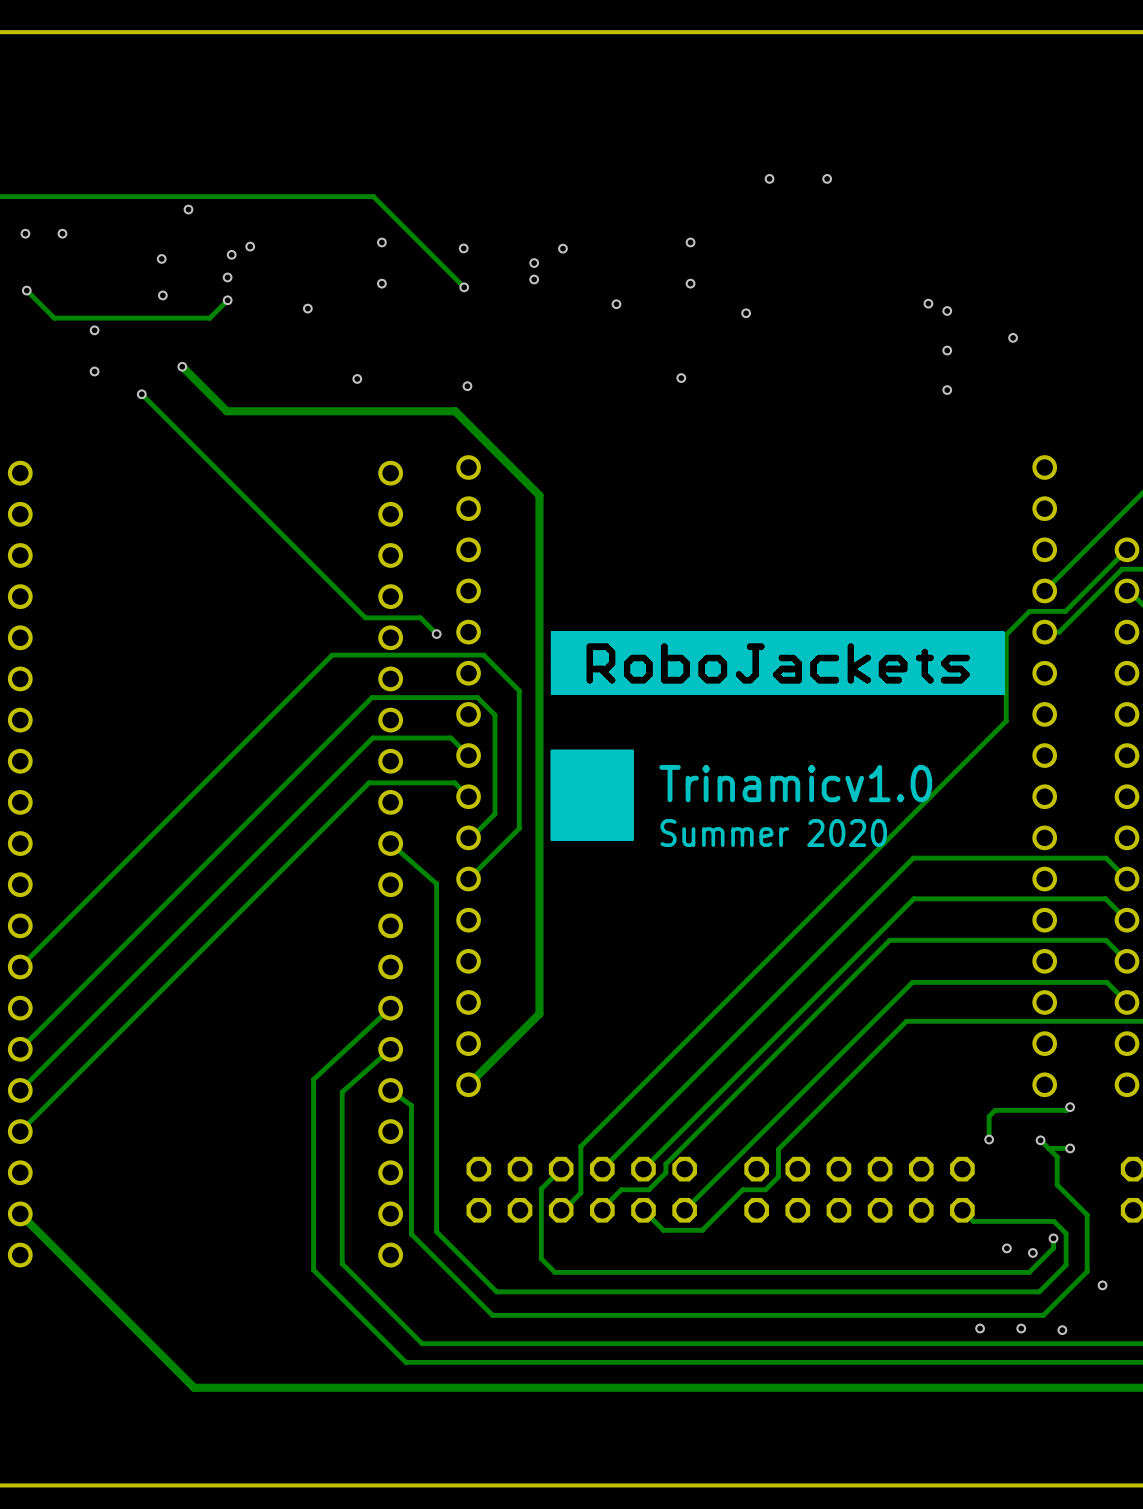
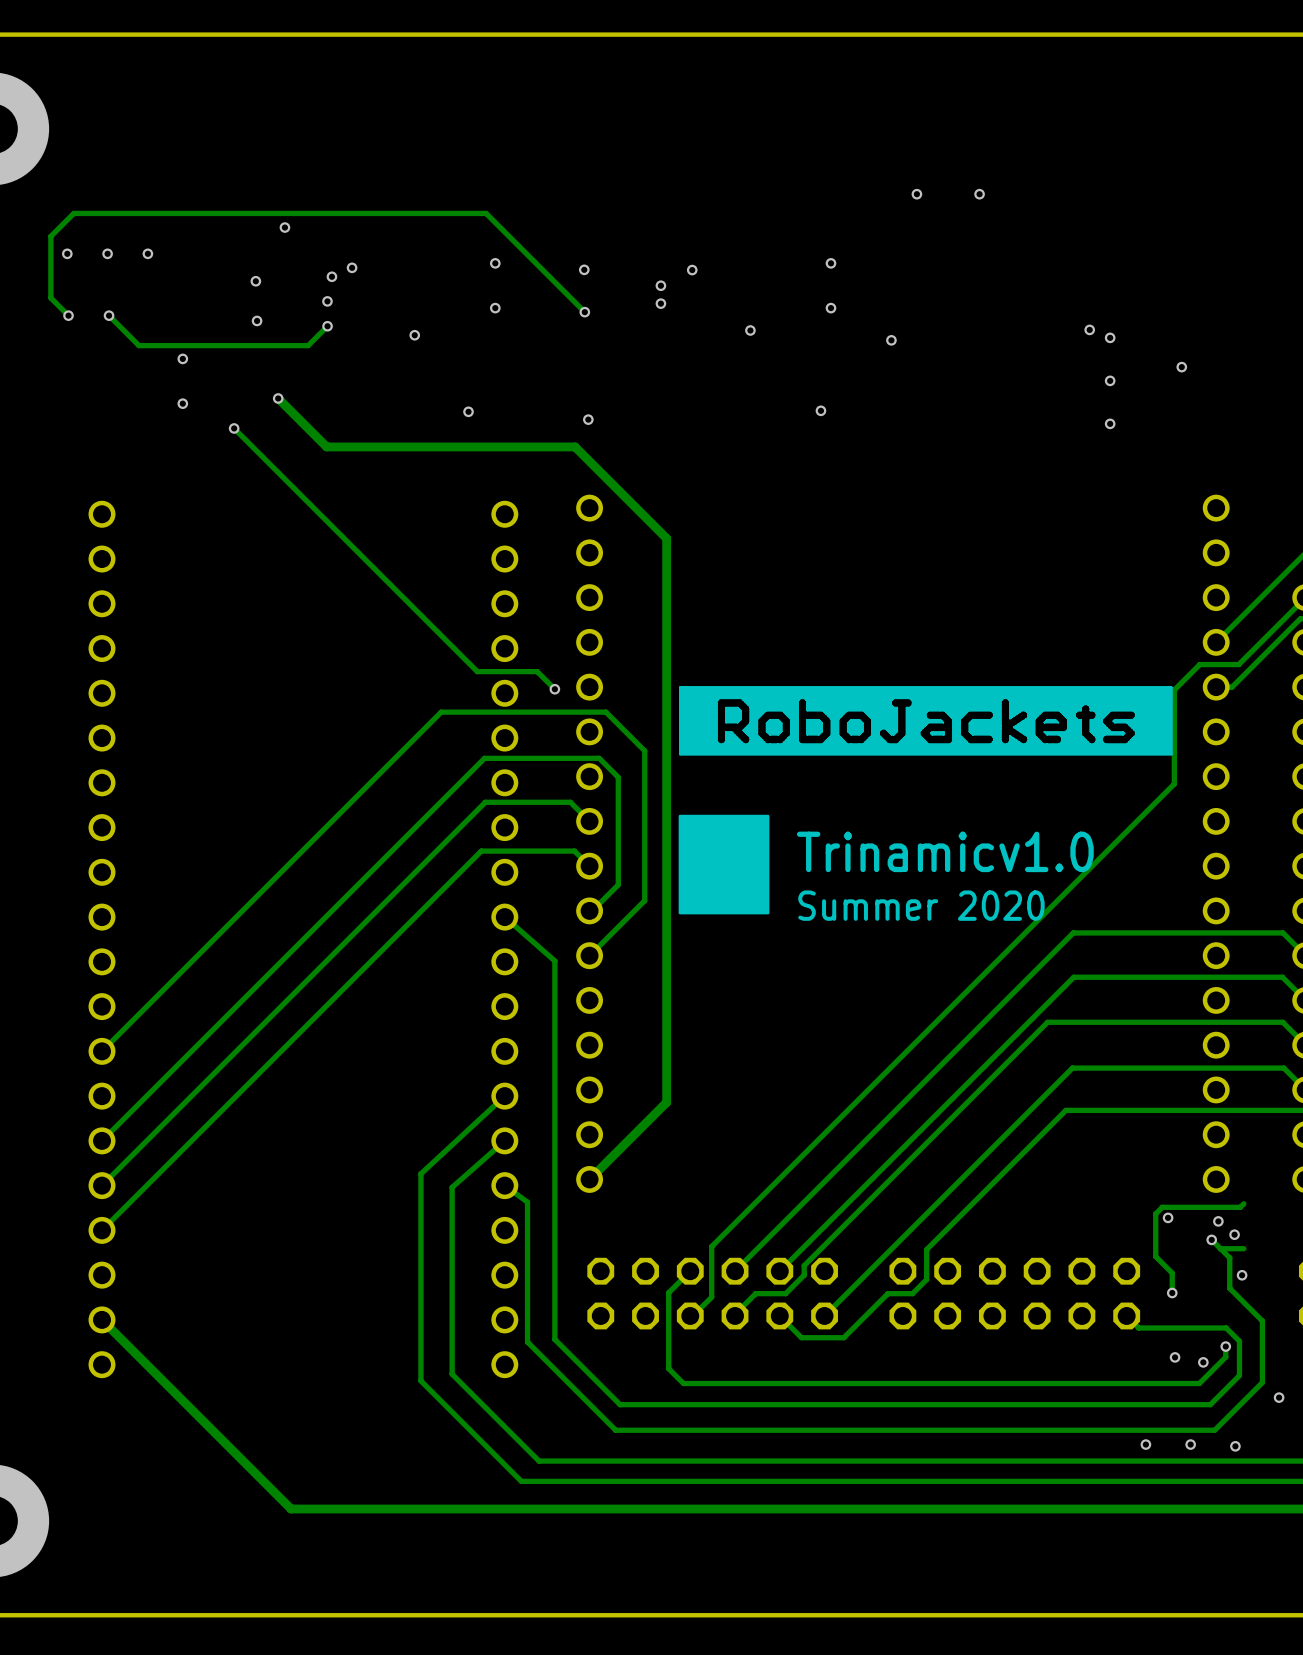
via: (1070, 1107) -> none
via: none -> (1218, 1221)
via: none -> (1234, 1234)
track: none -> (1155, 1239) (1155, 1256) (1172, 1273) (1172, 1293)
via position: (989, 1139) -> (1168, 1217)
via: (1070, 1148) -> none
via: none -> (1242, 1275)
via: none -> (1172, 1293)

